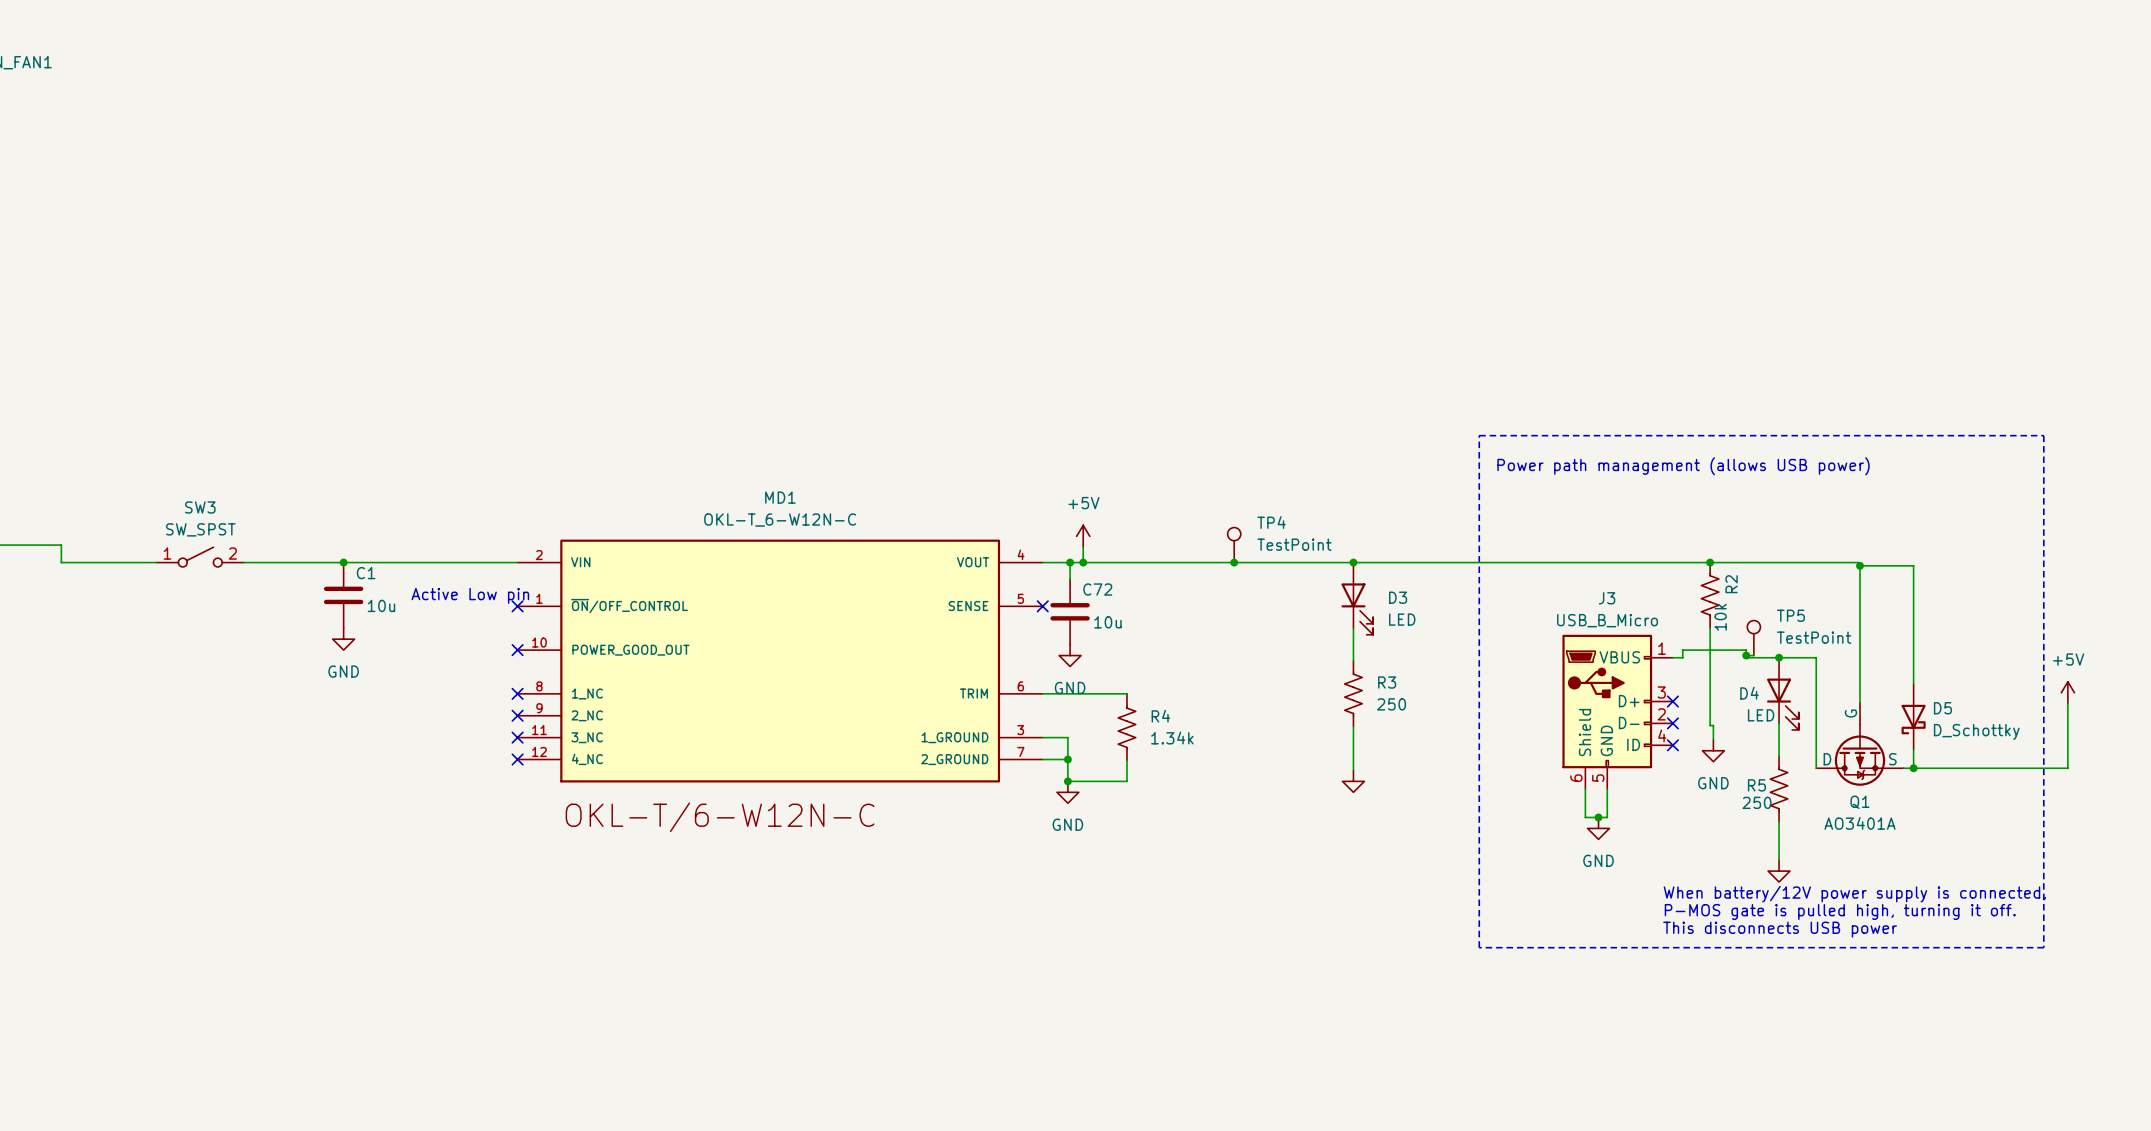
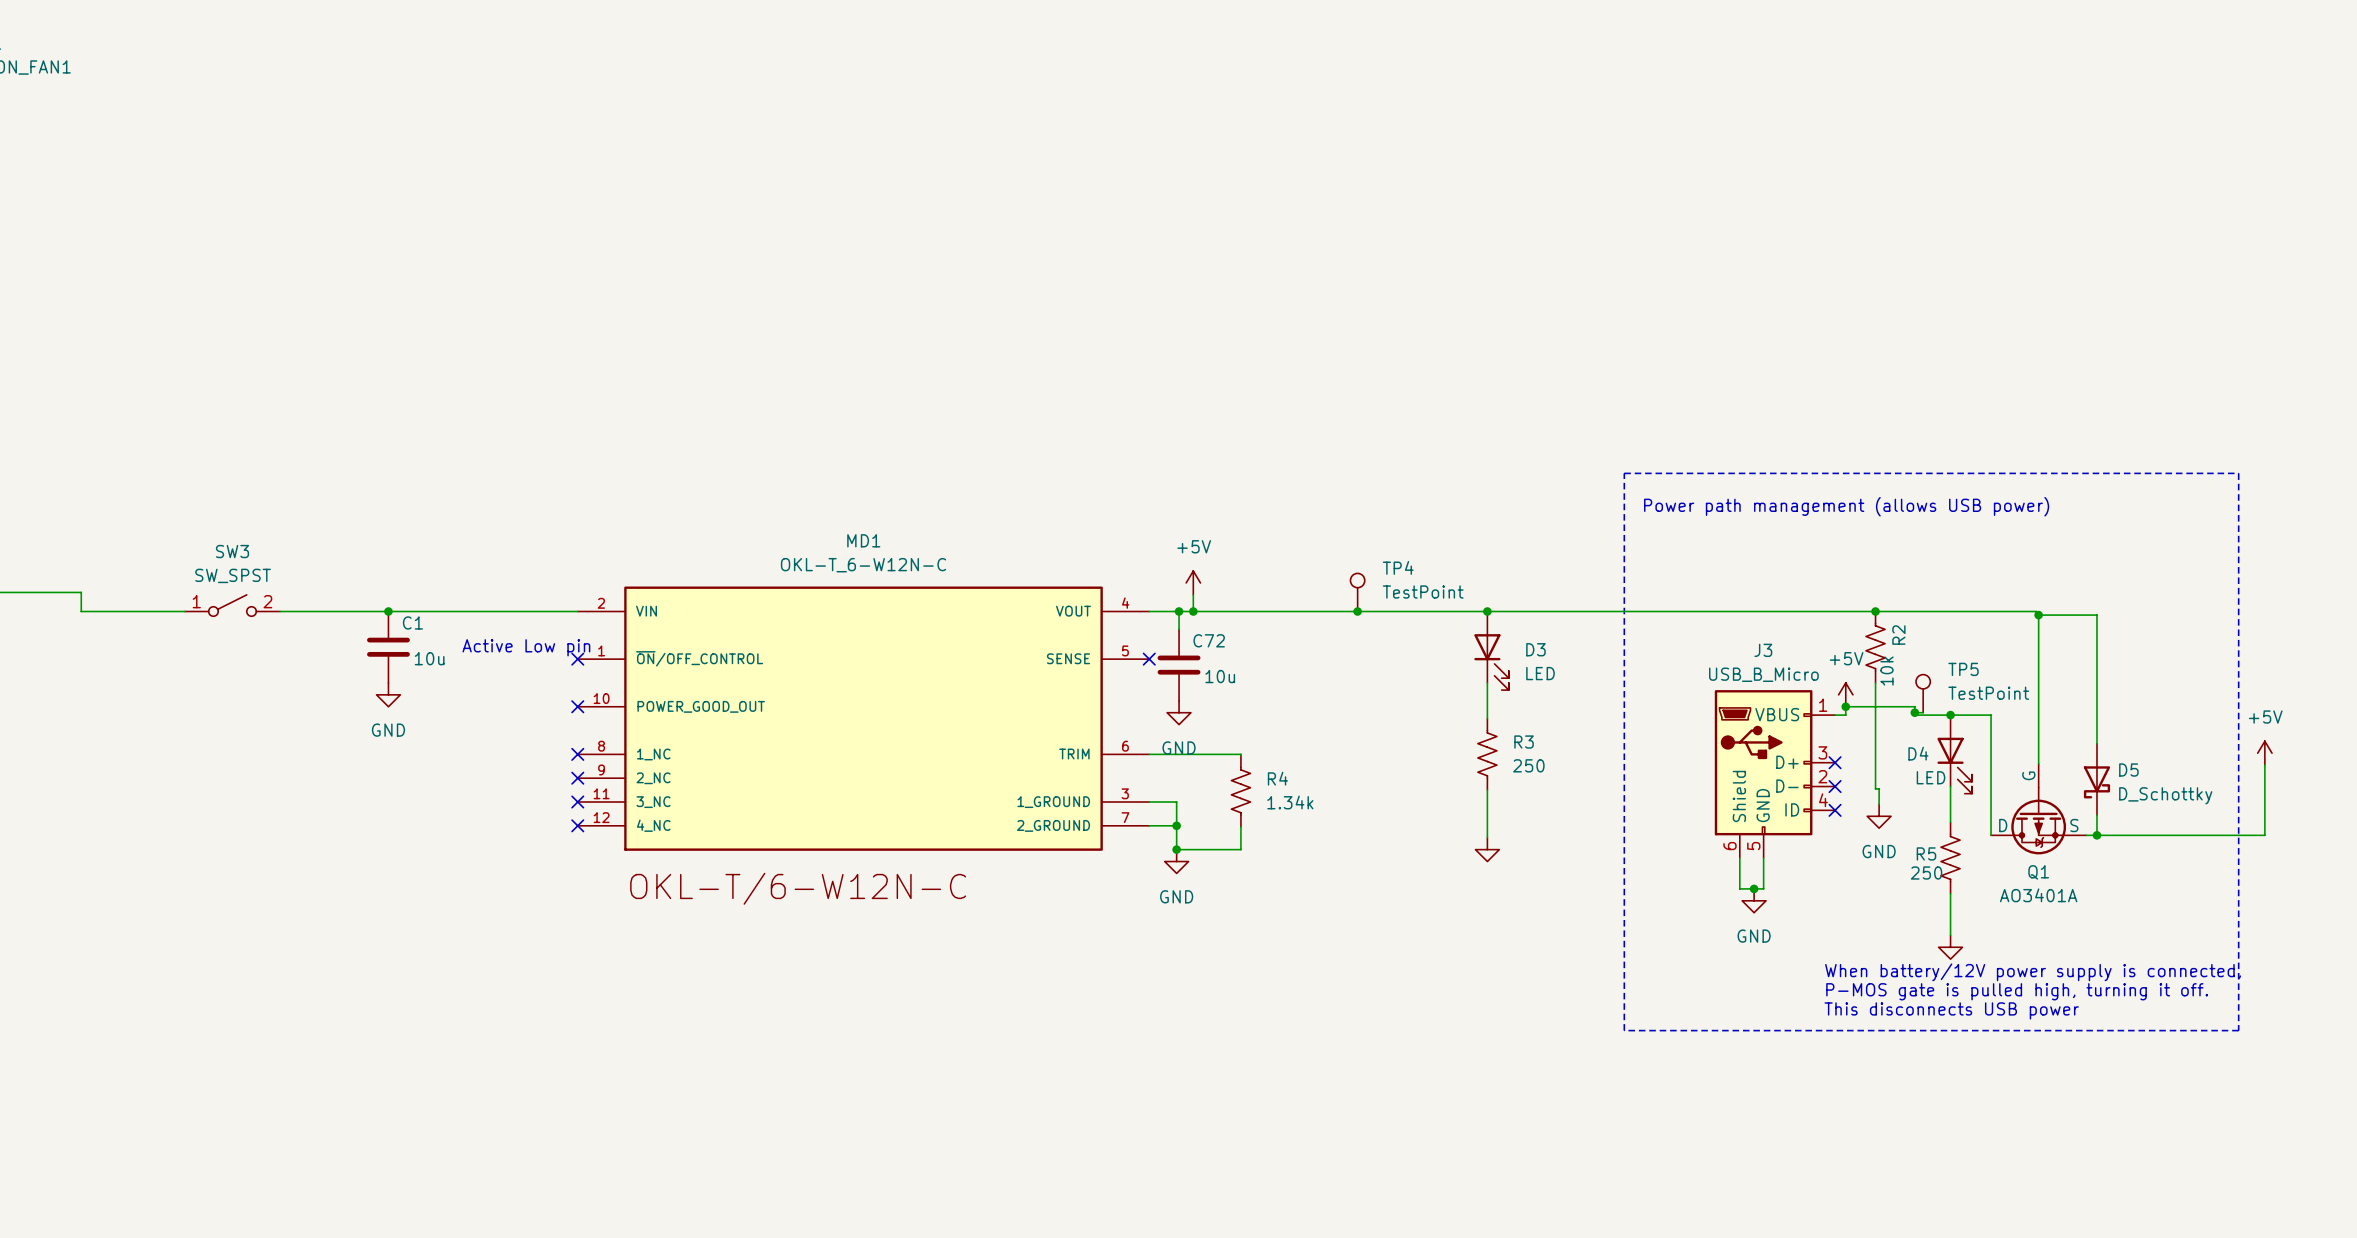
power symbol: none -> +5V (1845, 694)
junction: none -> (1845, 706)

